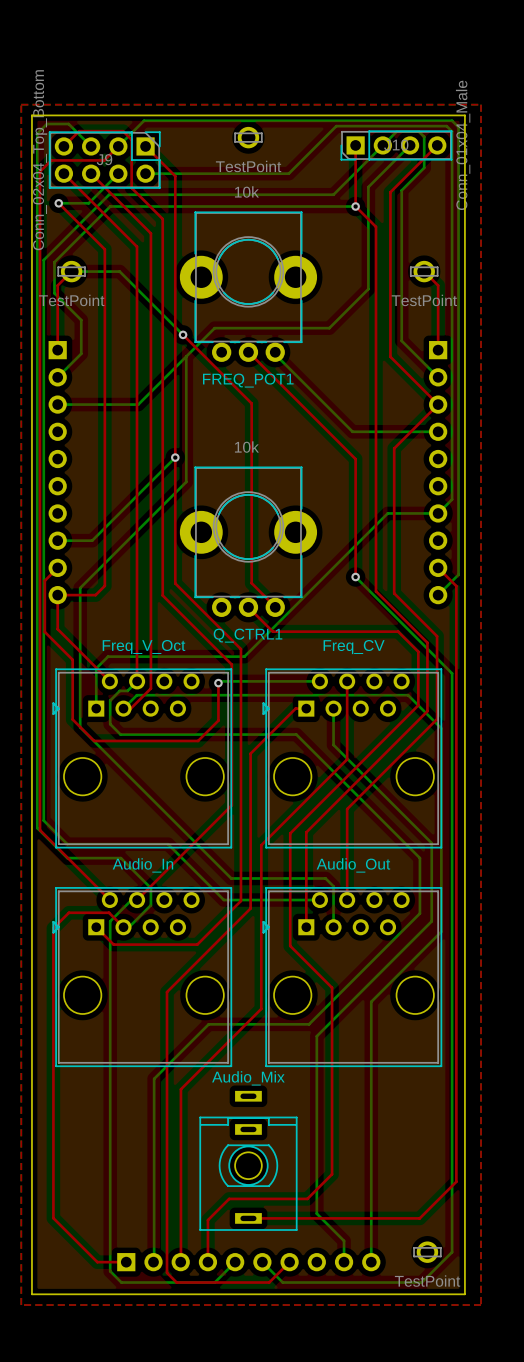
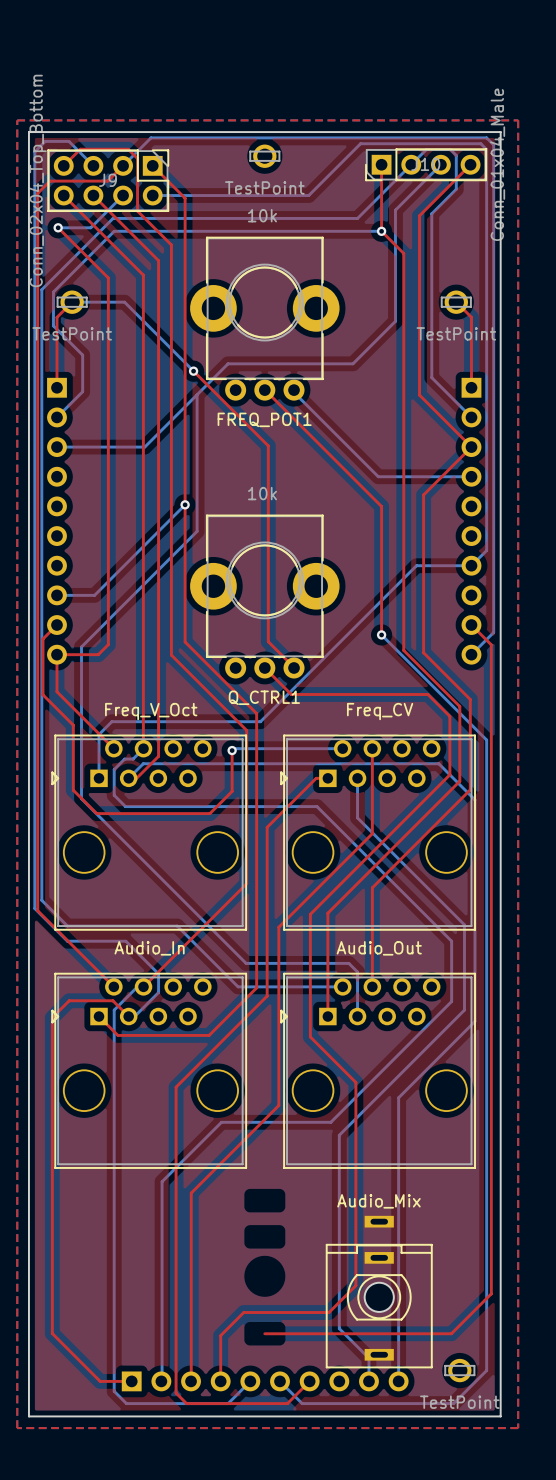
part position: (248, 1160) -> (379, 1292)

